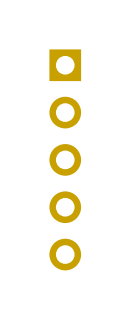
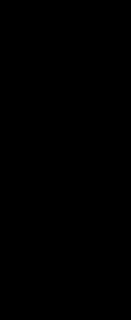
part: (65, 159) -> none

